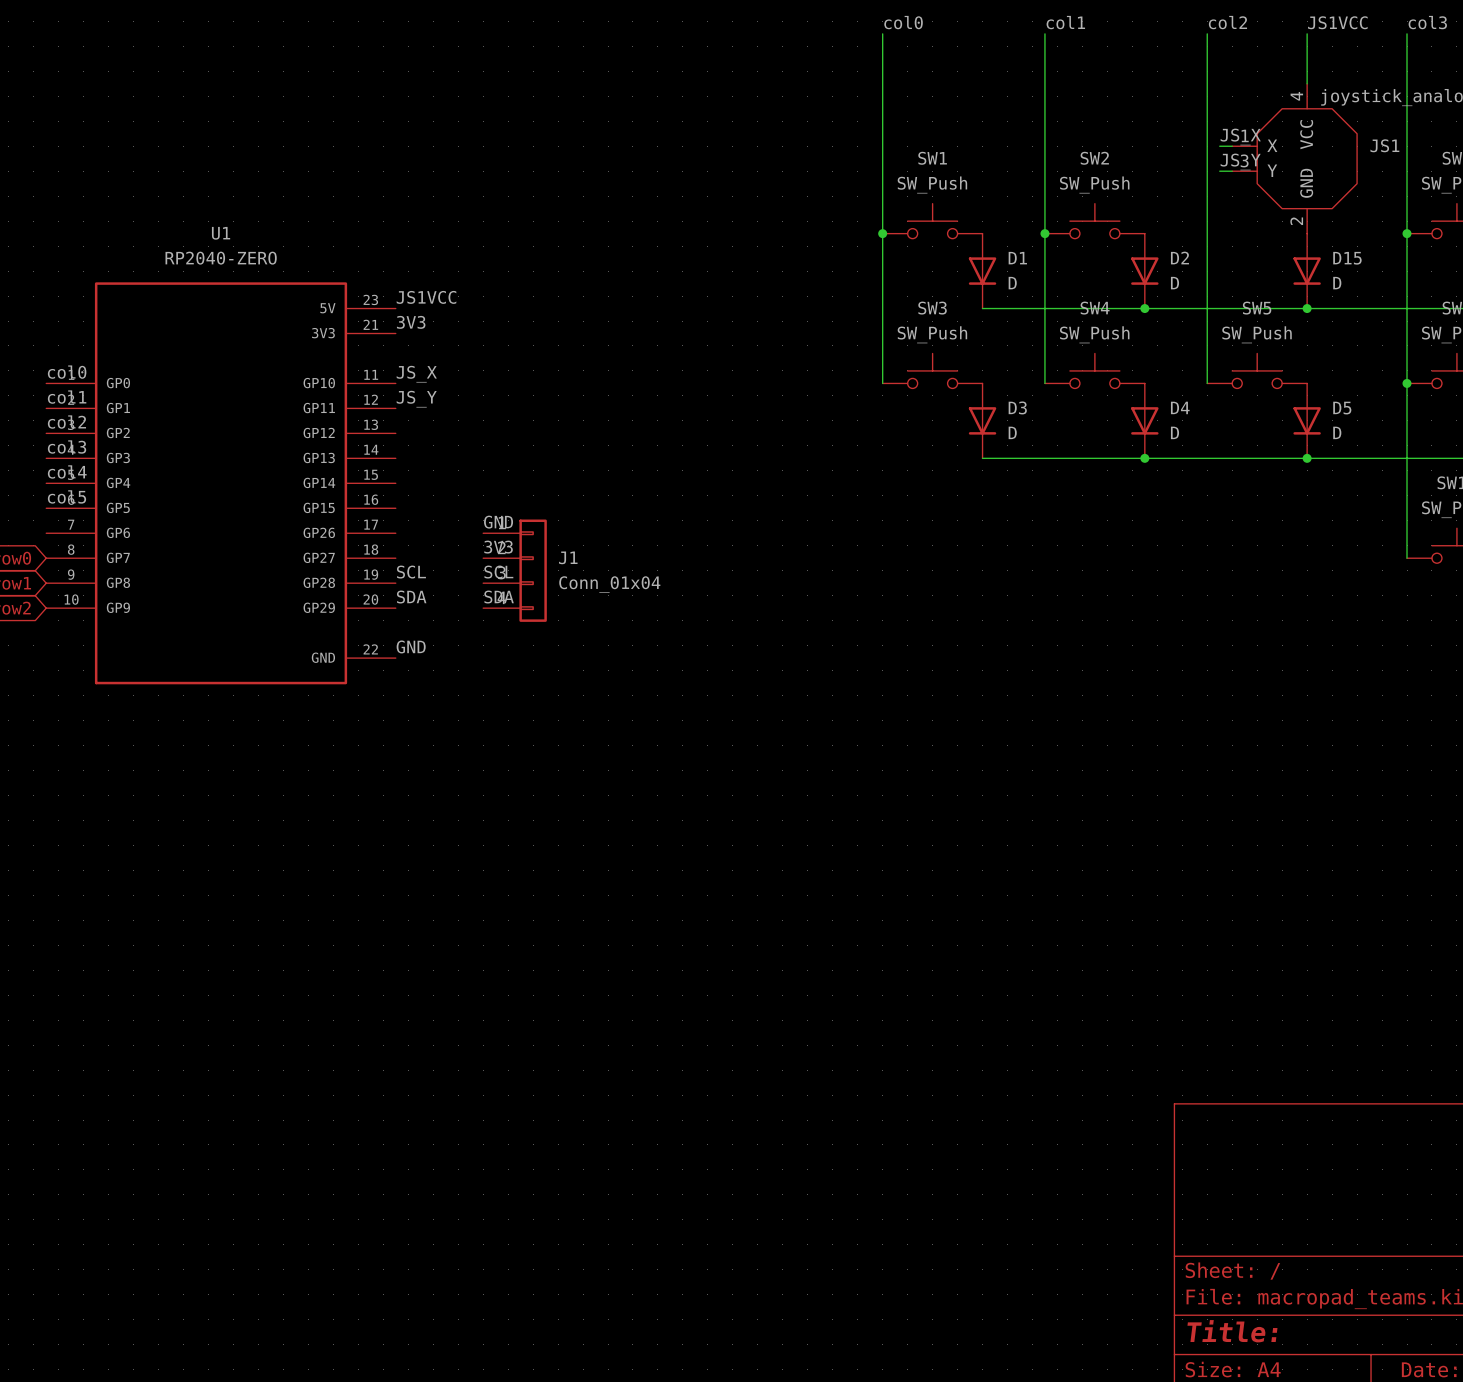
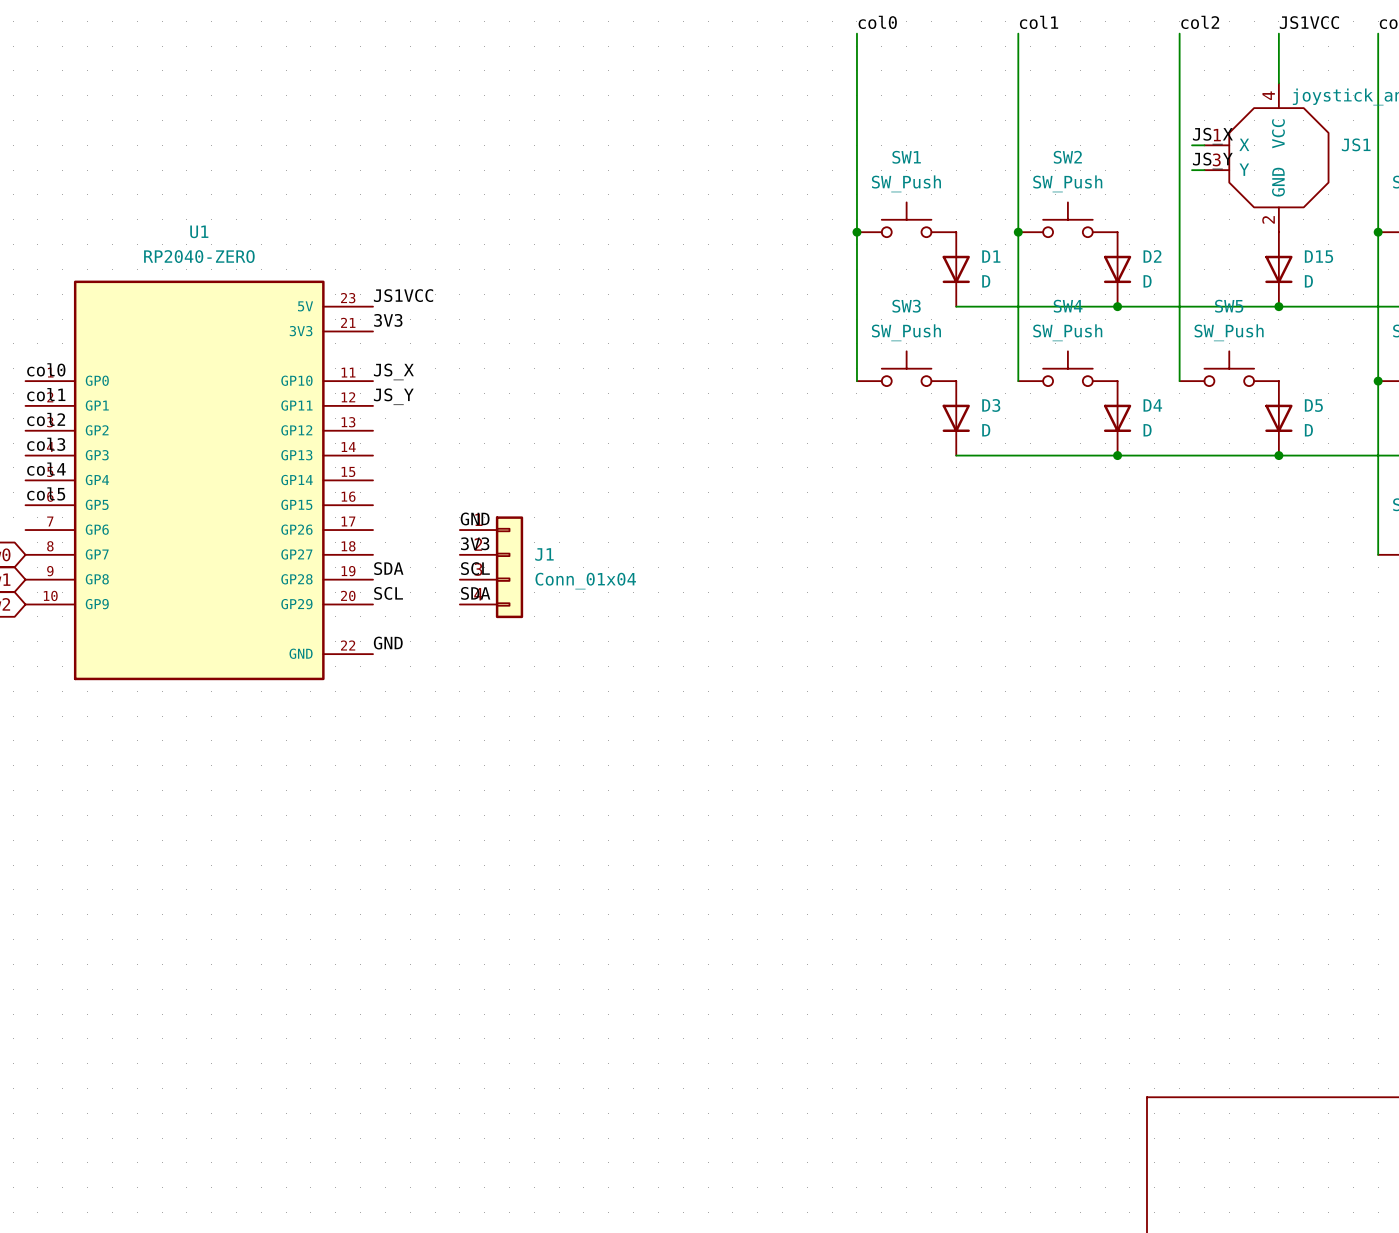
label: SCL (411, 572) -> SDA (388, 568)
label: SDA (411, 597) -> SCL (388, 593)

